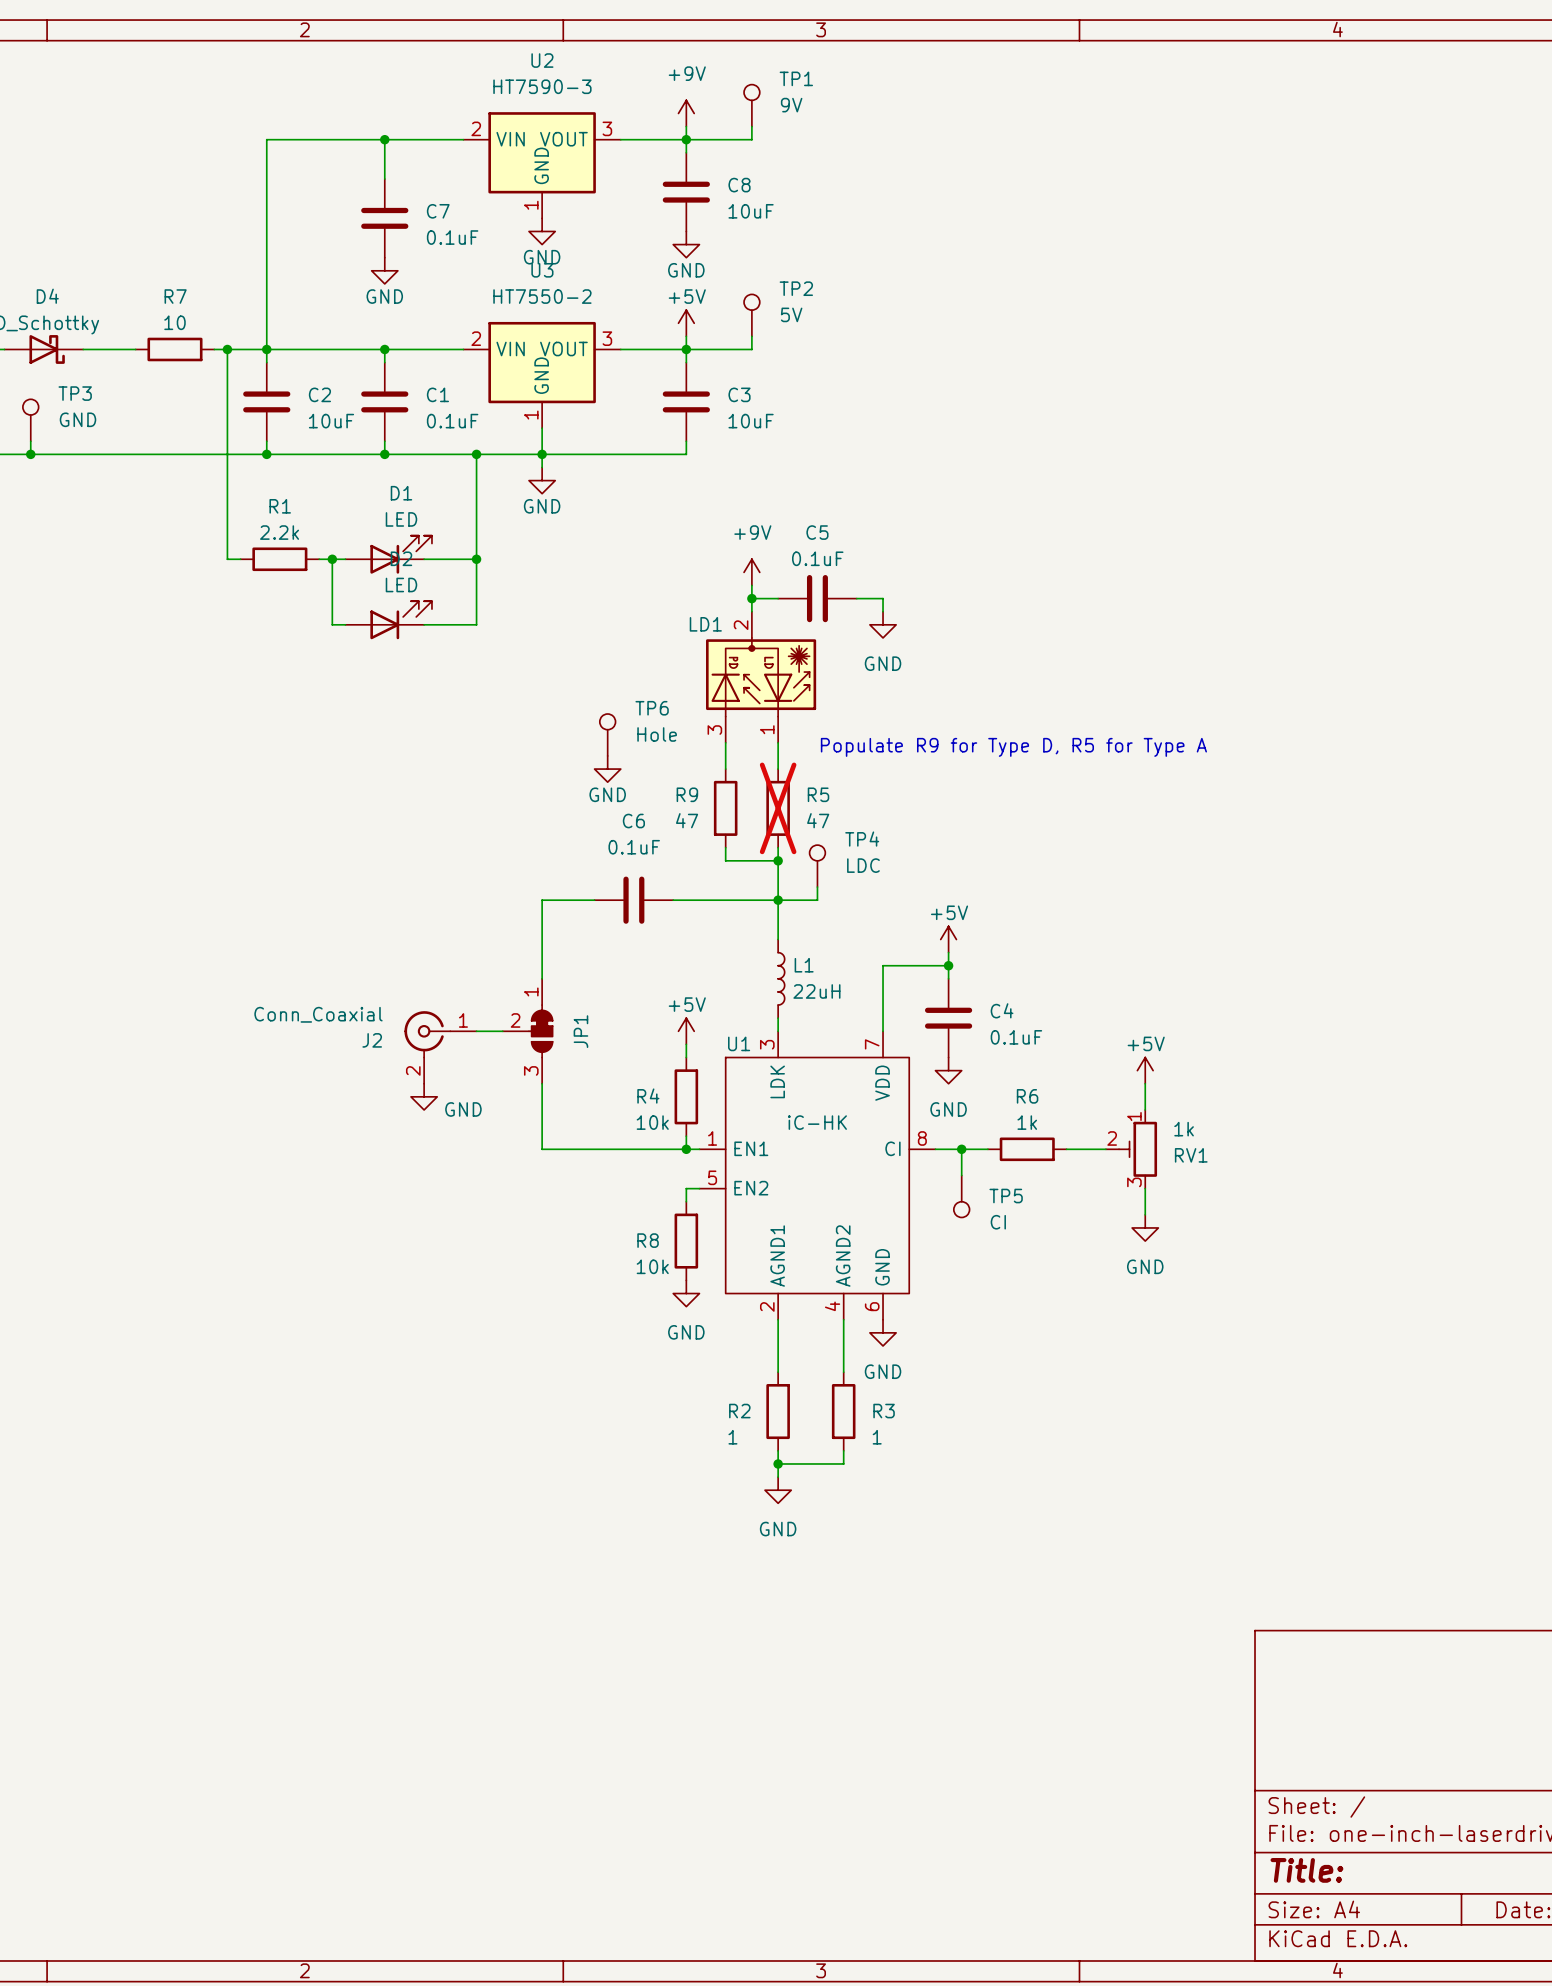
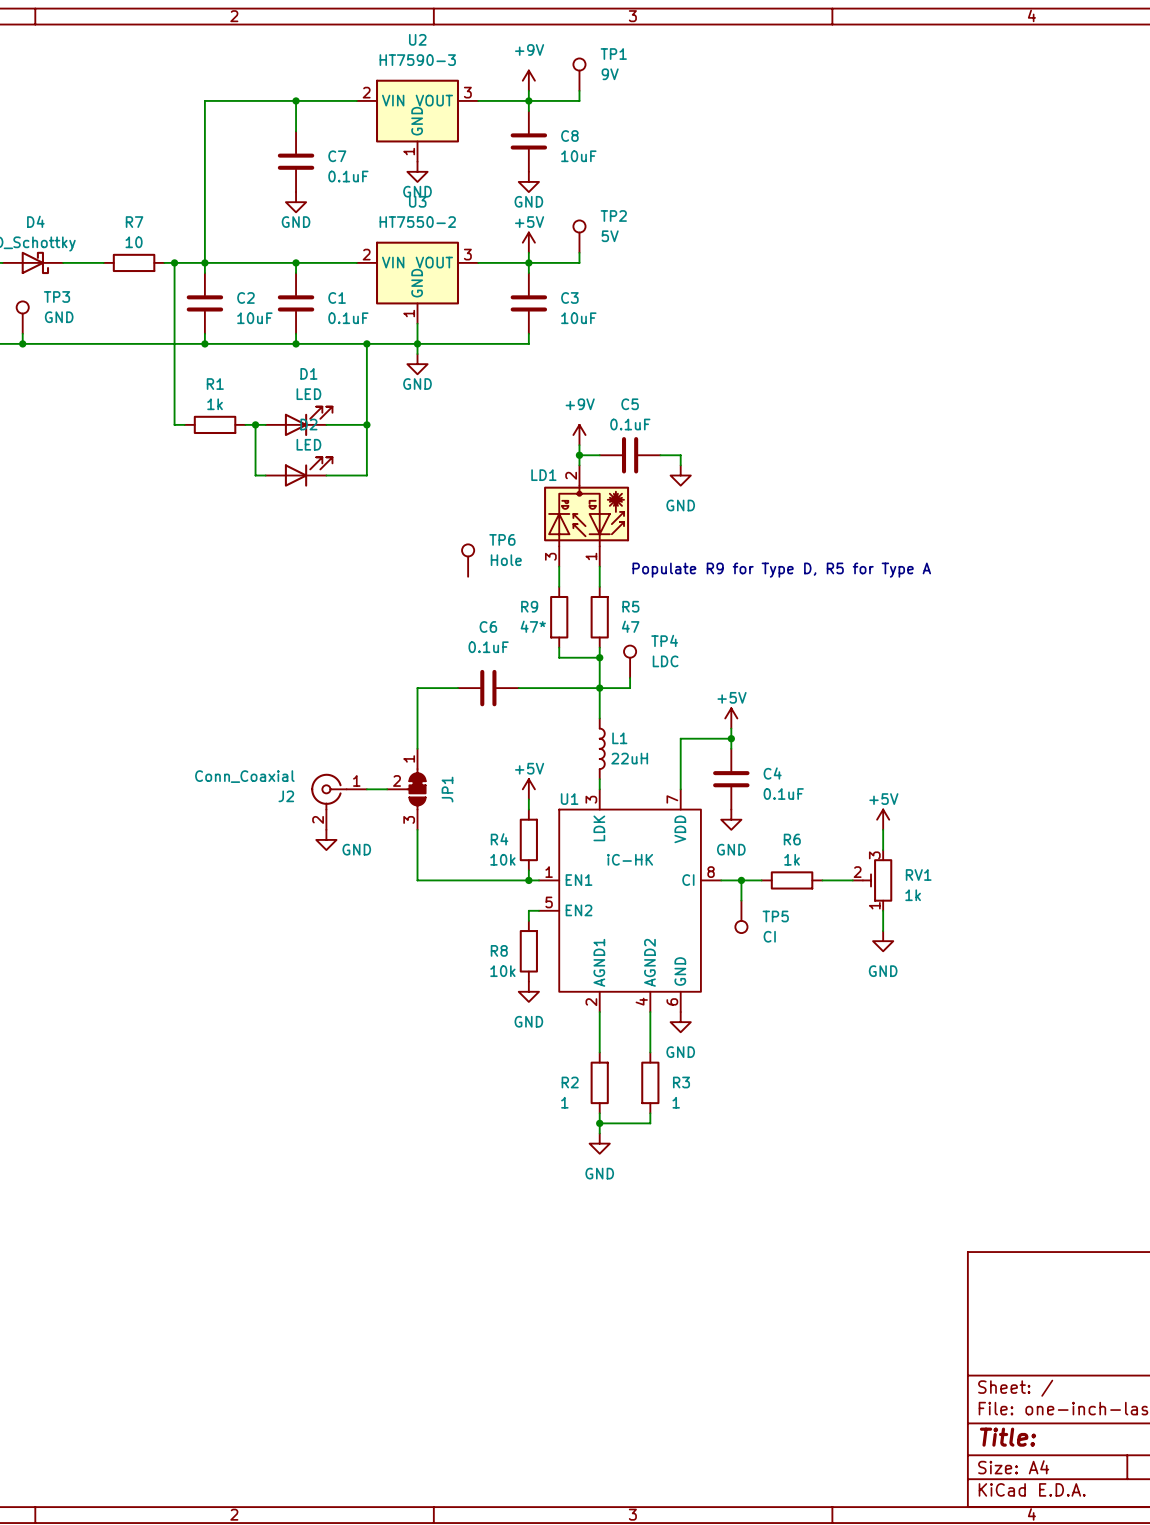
R1 value: 2.2k (279, 532) -> 1k (215, 404)
power symbol: GND (607, 769) -> none
R5 do-not-place cross: (778, 808) -> none
R9 value: 47 (687, 820) -> 47* (533, 626)
RV1 flip: as is (1138, 1149) -> up-down (877, 880)

